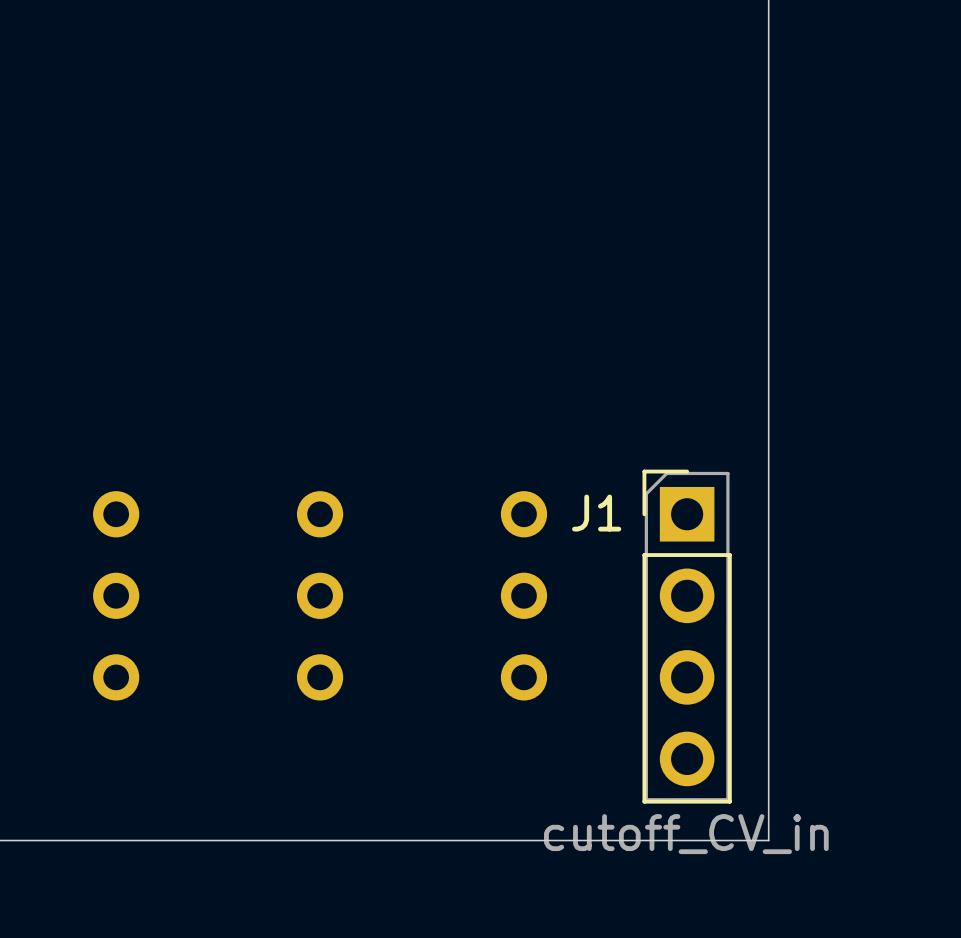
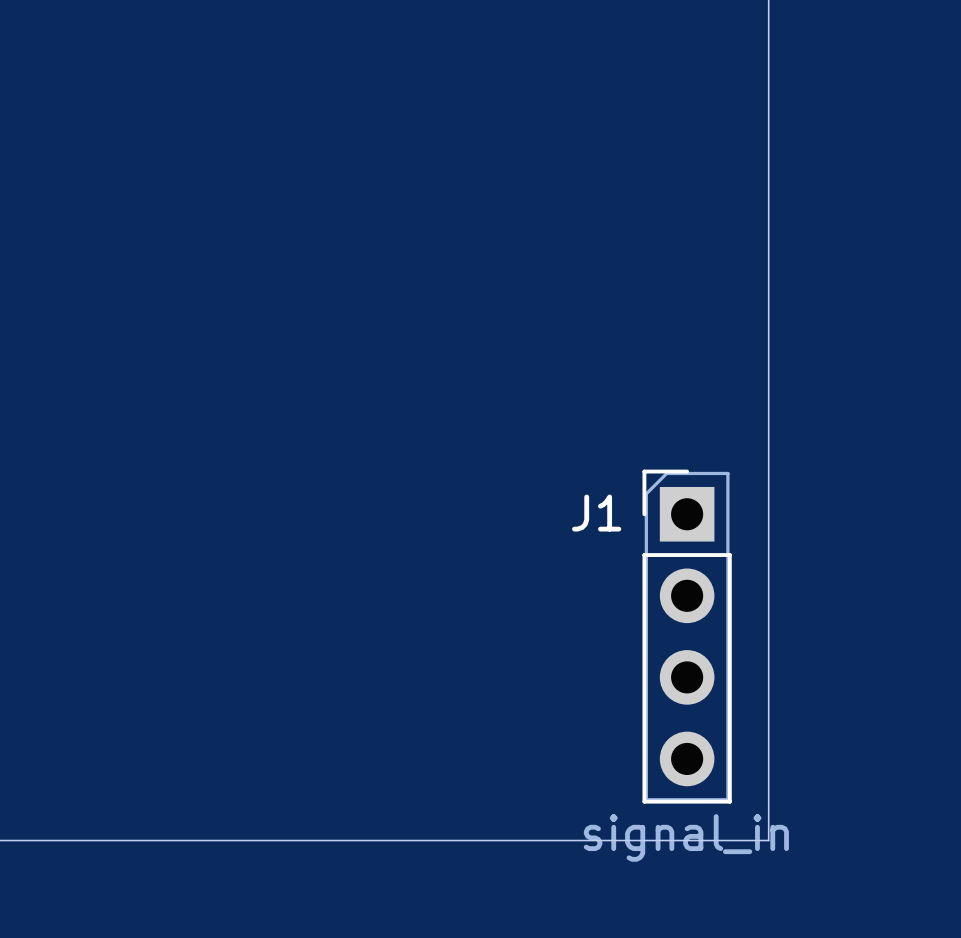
part: (116, 595) -> none
part: (320, 595) -> none
part: (524, 595) -> none
J1 value: cutoff_CV_in (686, 834) -> signal_in (686, 837)

